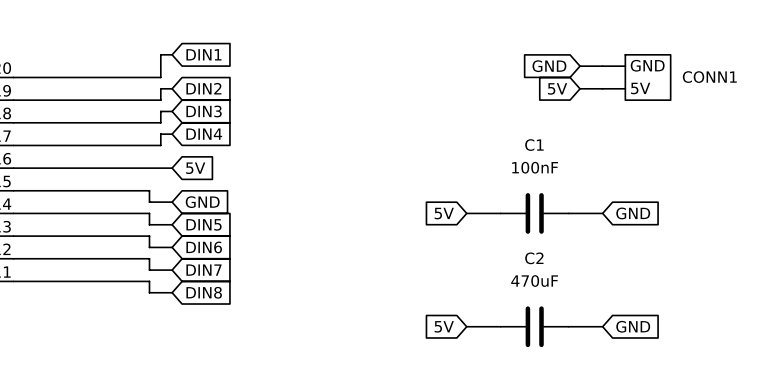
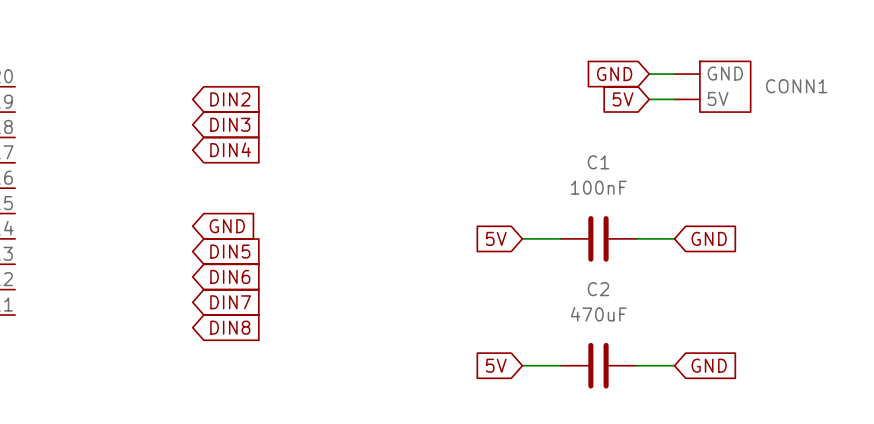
wire: (172, 54) (160, 54) (160, 77) (13, 77) -> none
global label: DIN1 (203, 54) -> none
wire: (172, 88) (160, 88) (160, 100) (13, 100) -> none
wire: (172, 111) (160, 111) (160, 122) (13, 122) -> none
wire: (172, 134) (160, 134) (160, 145) (13, 145) -> none
wire: (13, 168) (172, 168) -> none
global label: 5V (195, 168) -> none
wire: (13, 190) (149, 190) (149, 202) (172, 202) -> none
wire: (13, 213) (149, 213) (149, 224) (172, 224) -> none
wire: (13, 236) (149, 236) (149, 247) (172, 247) -> none
wire: (13, 258) (149, 258) (149, 270) (172, 270) -> none
wire: (13, 281) (149, 281) (149, 292) (172, 292) -> none

